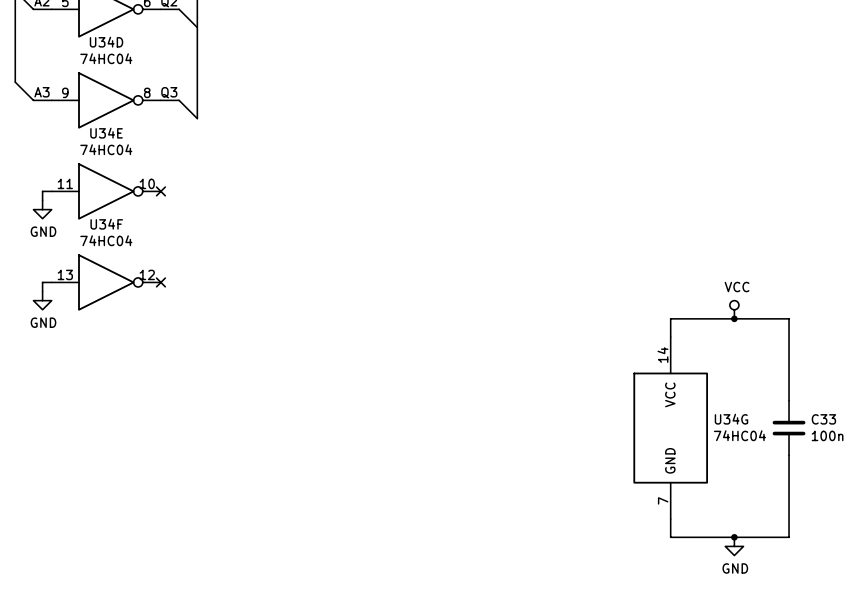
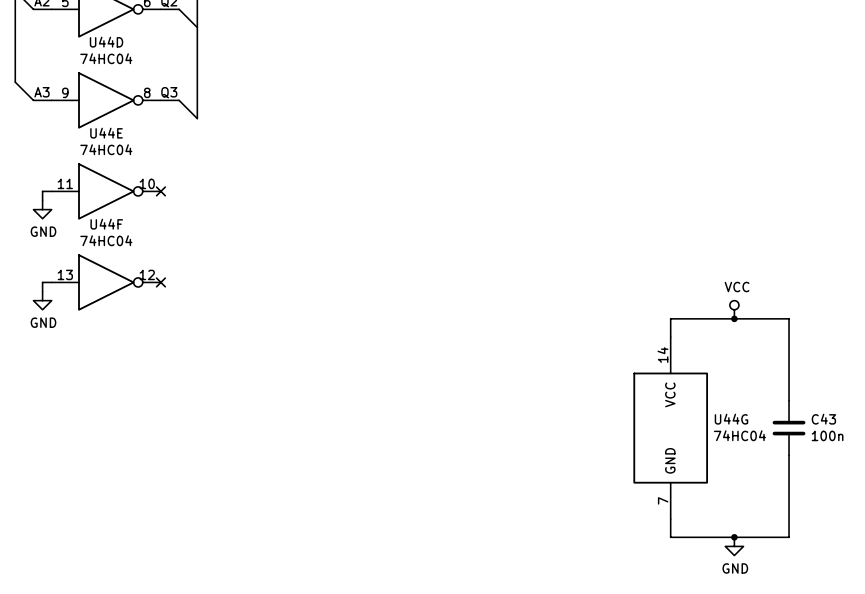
U34D name: U34D (106, 42) -> U44D (106, 42)
U34E name: U34E (106, 133) -> U44E (106, 133)
U34F name: U34F (106, 224) -> U44F (106, 224)
U34G name: U34G (731, 419) -> U44G (731, 419)
C33 name: C33 (823, 419) -> C43 (823, 419)

